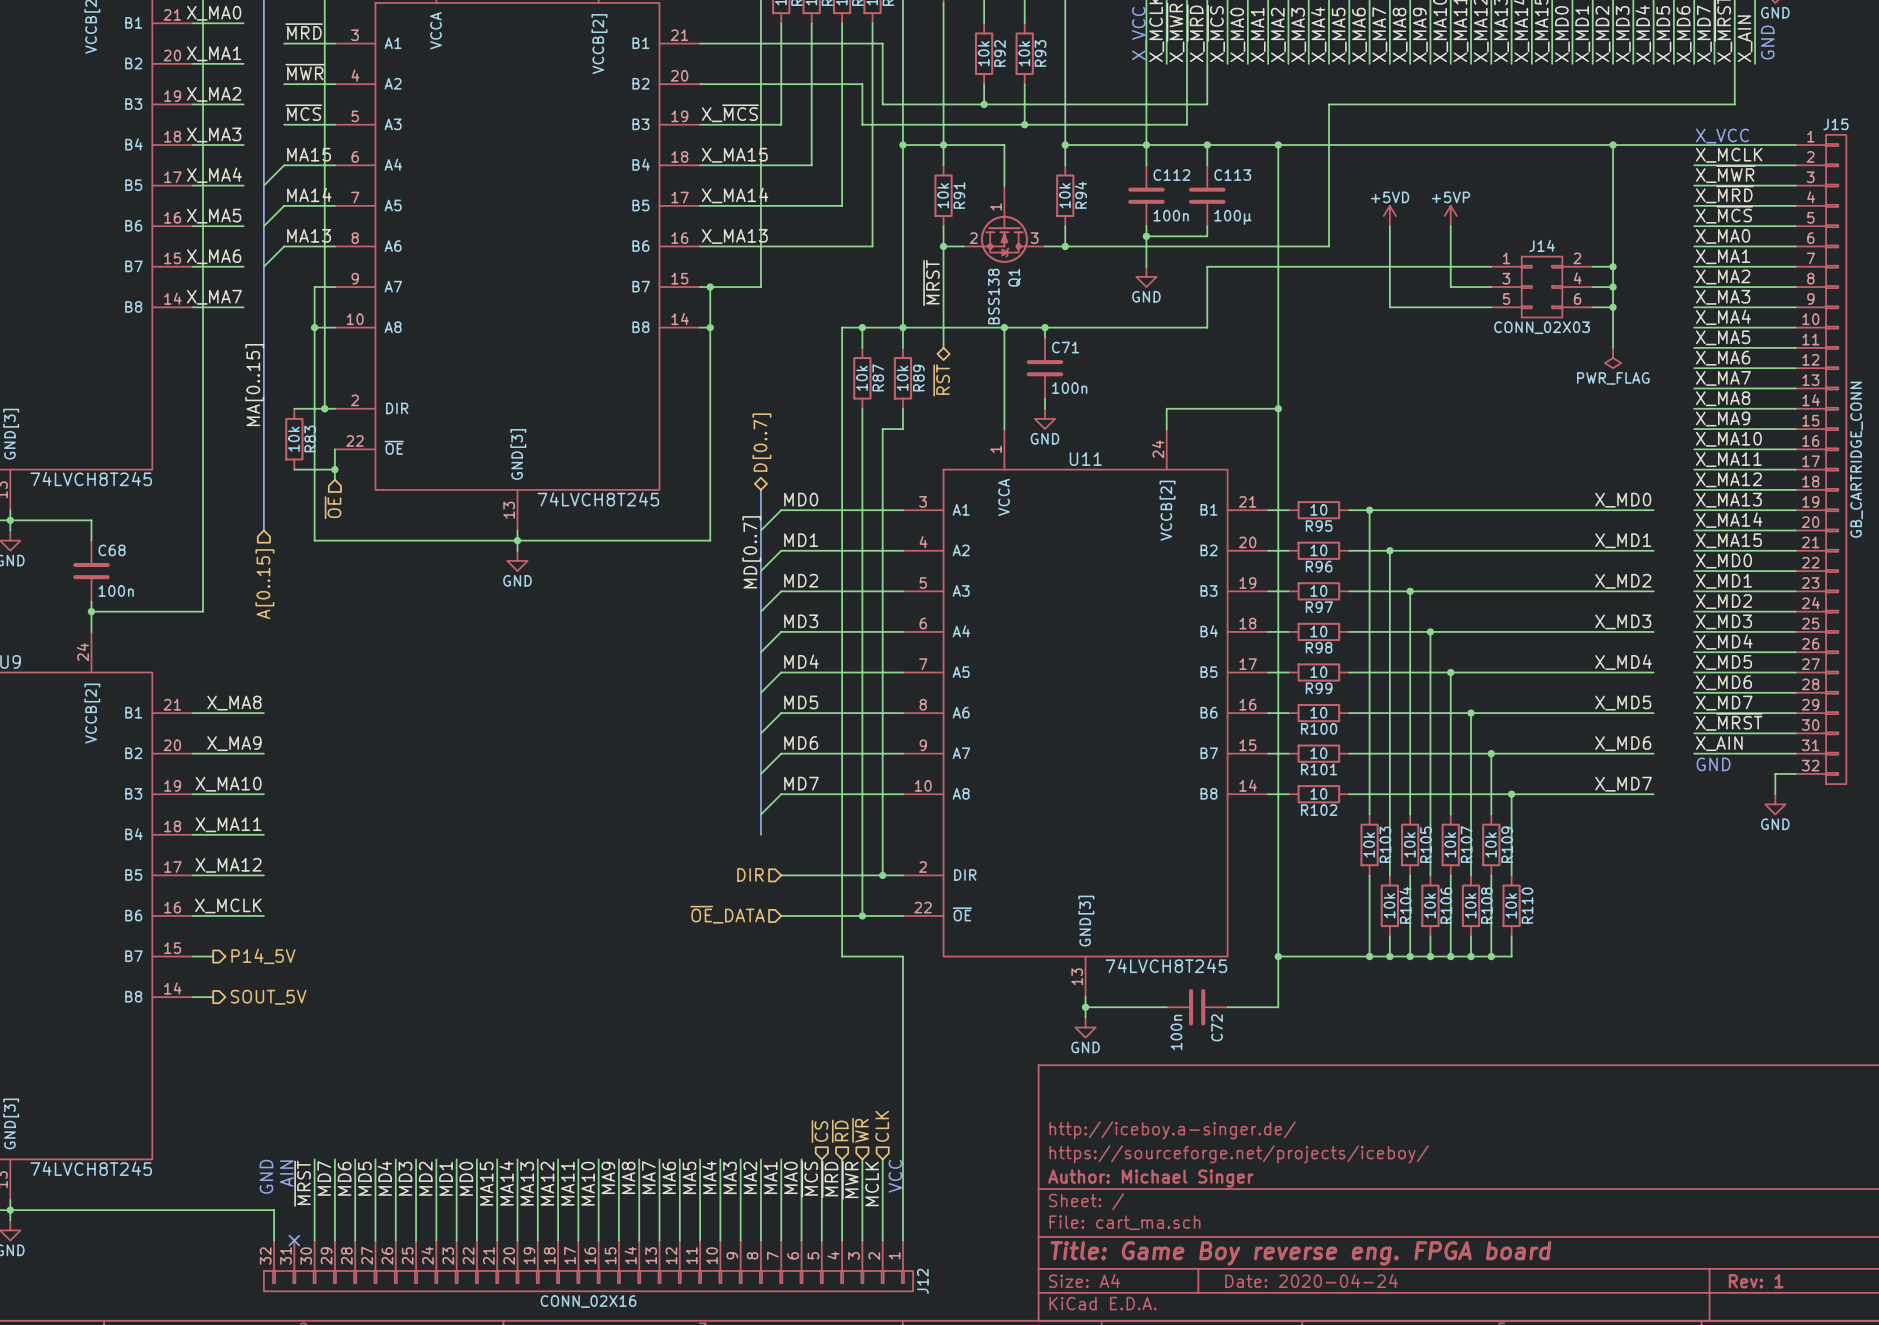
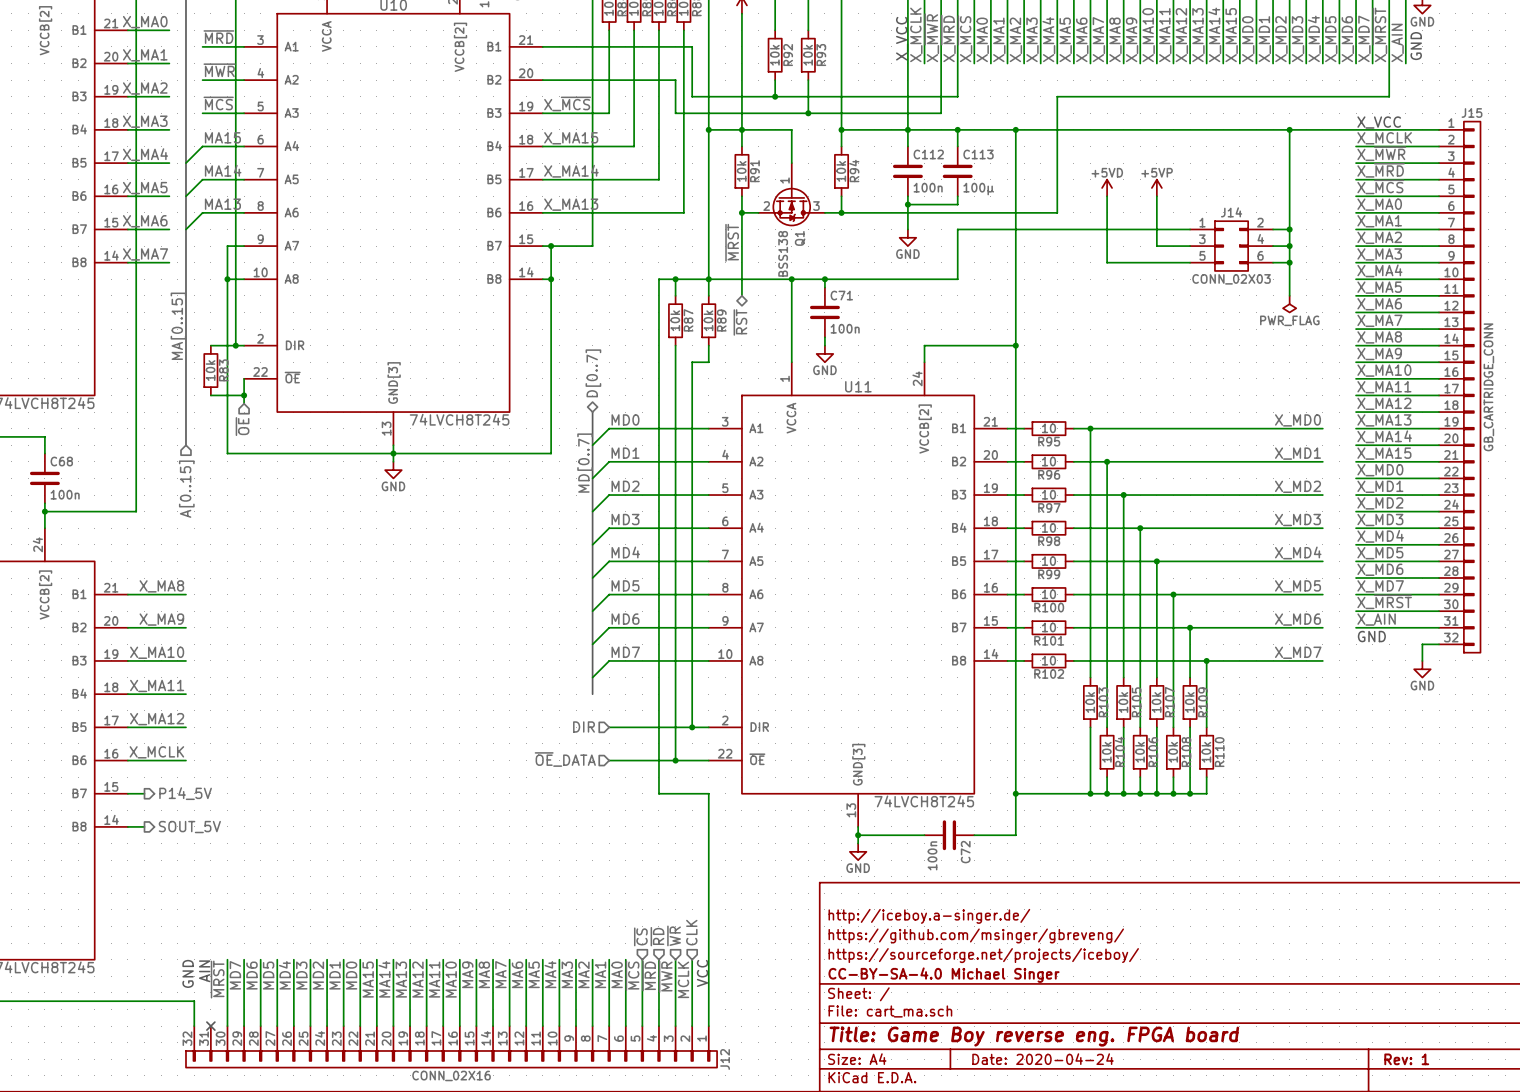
title block: none -> http://iceboy.a-singer.de/ (929, 916)
title block: http://iceboy.a-singer.de/ (1172, 1130) -> https://github.com/msinger/gbreveng/ (976, 935)
title block: Author: Michael Singer (1150, 1178) -> CC-BY-SA-4.0 Michael Singer (944, 975)

